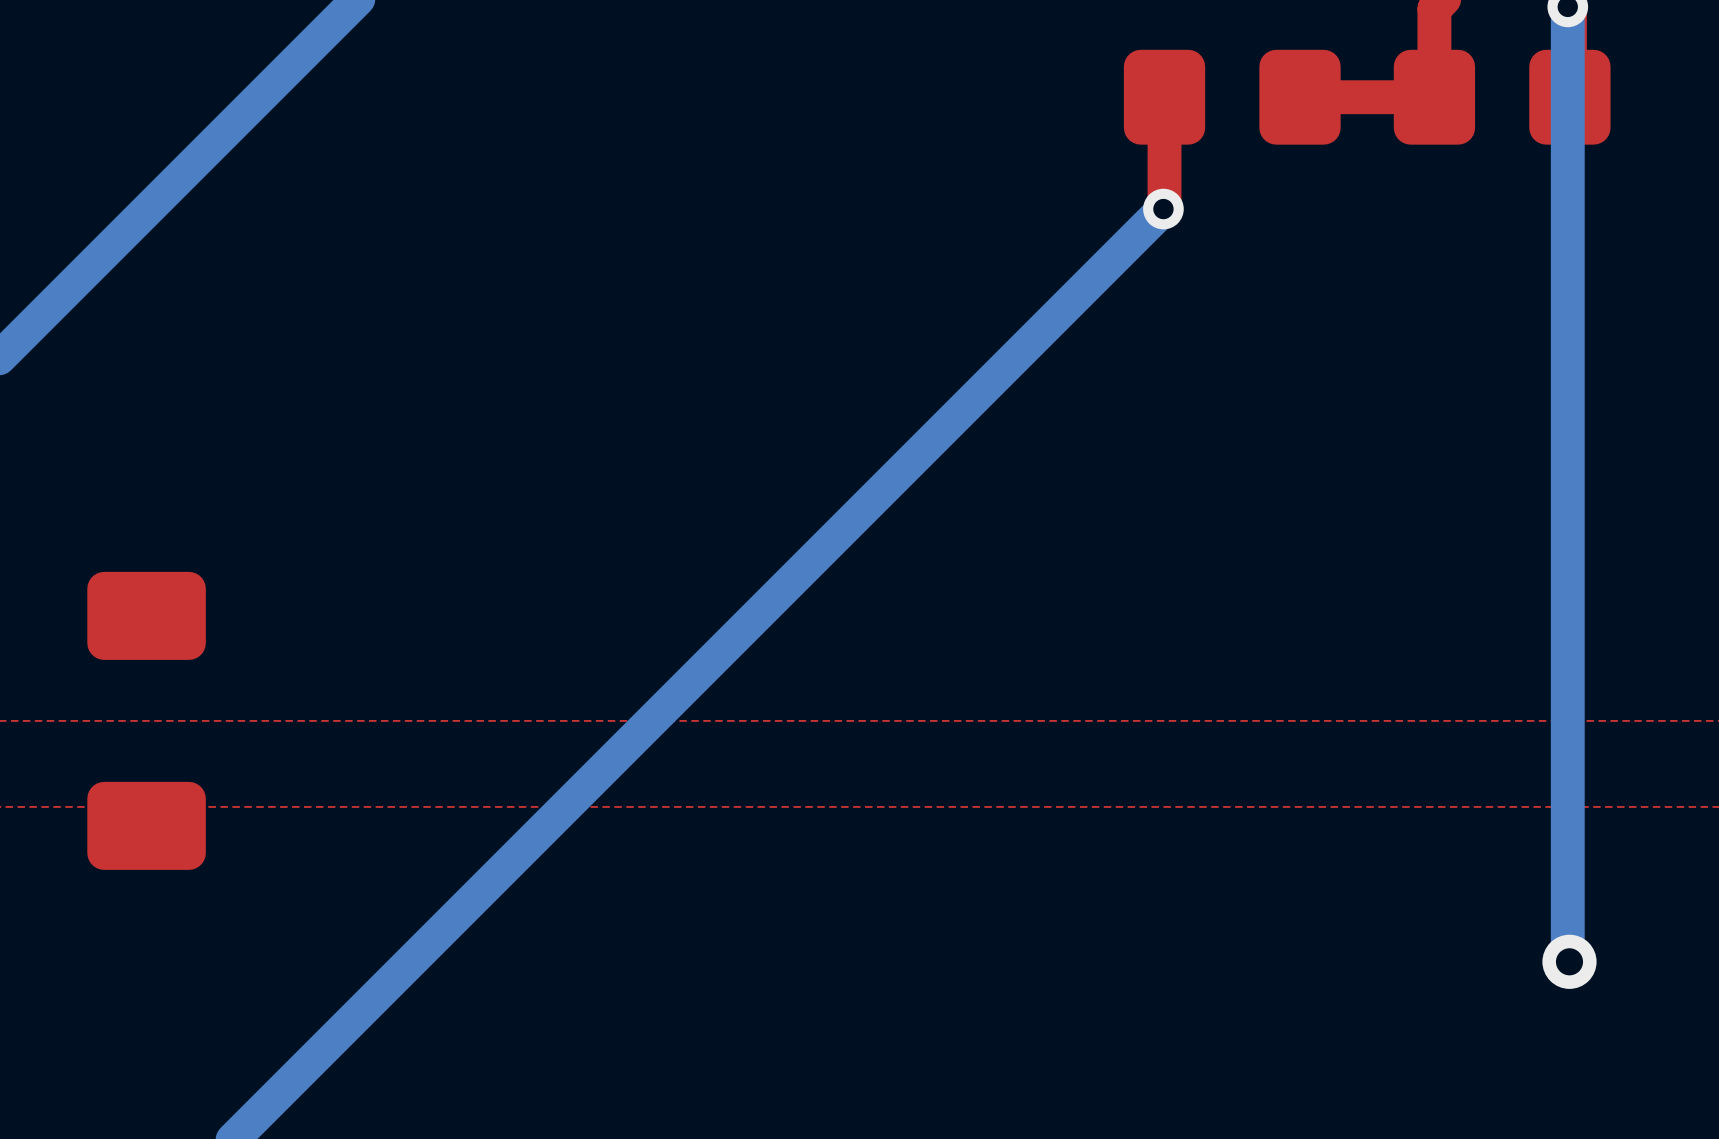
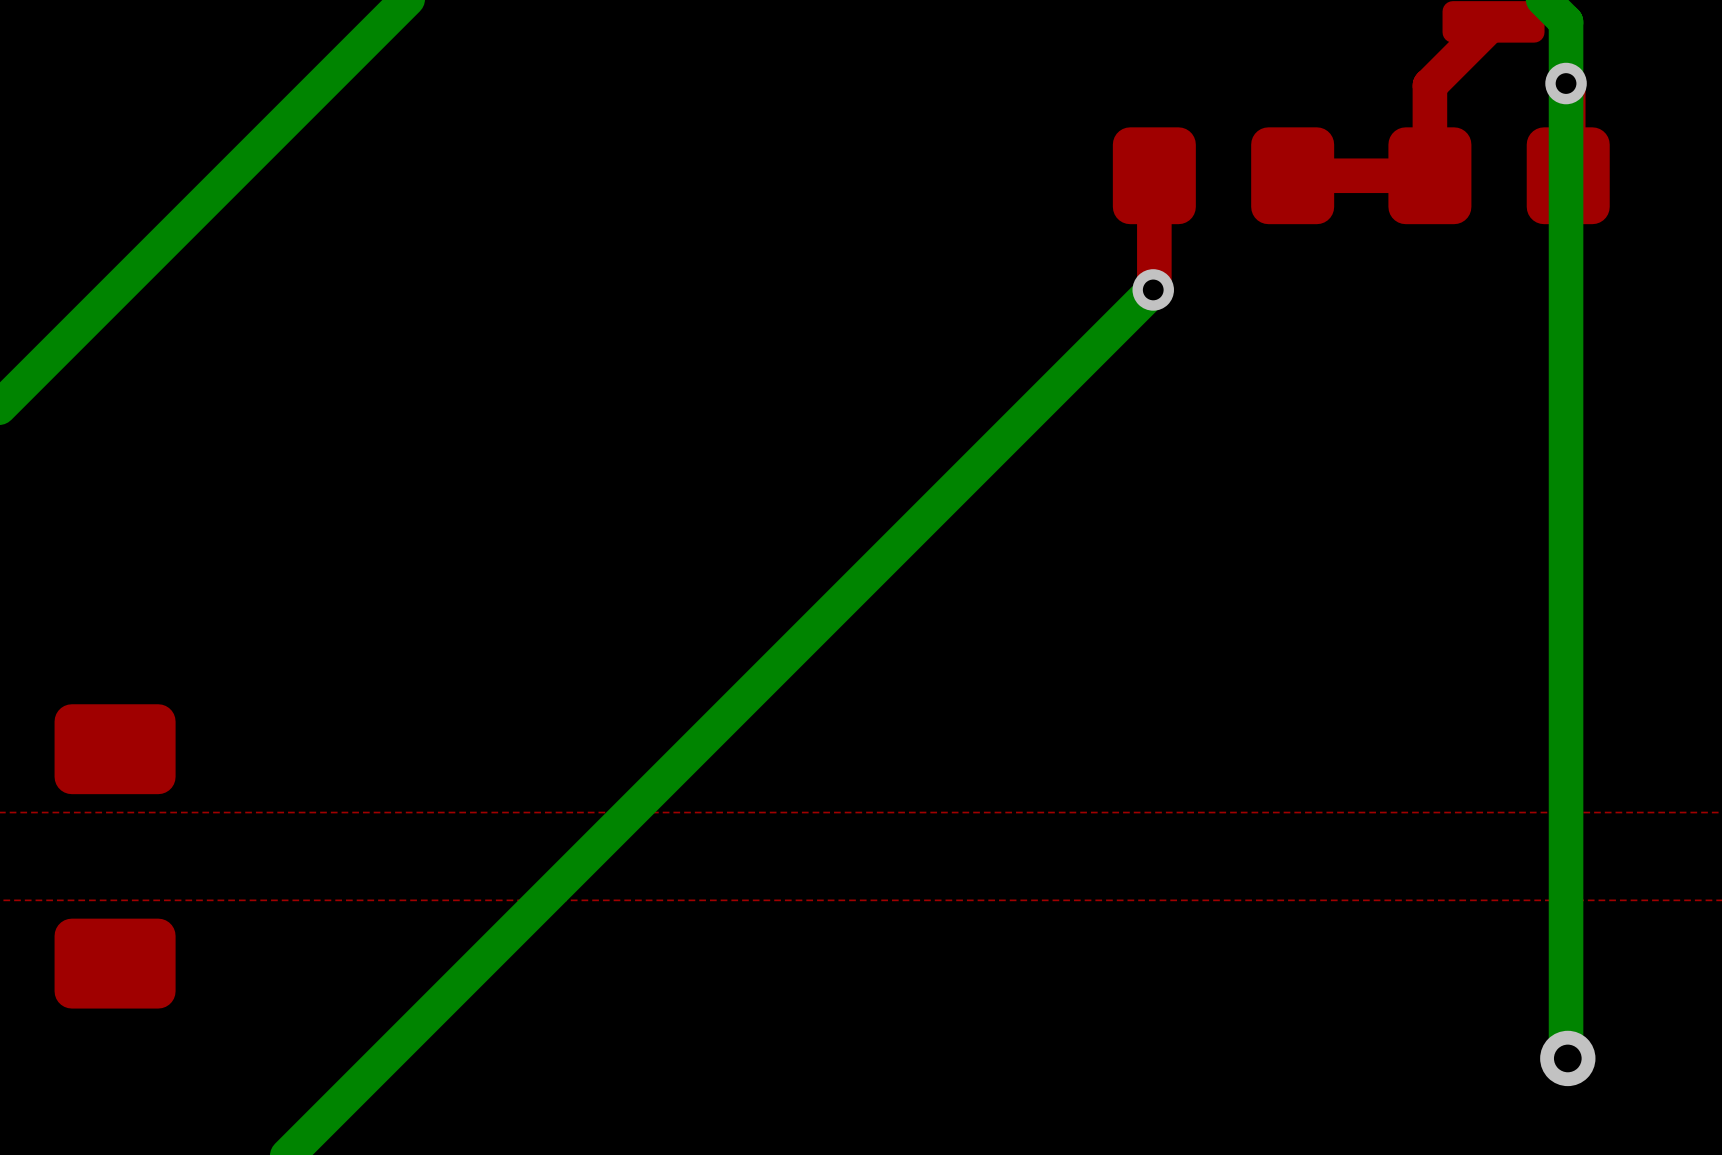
part position: (146, 720) -> (115, 856)

